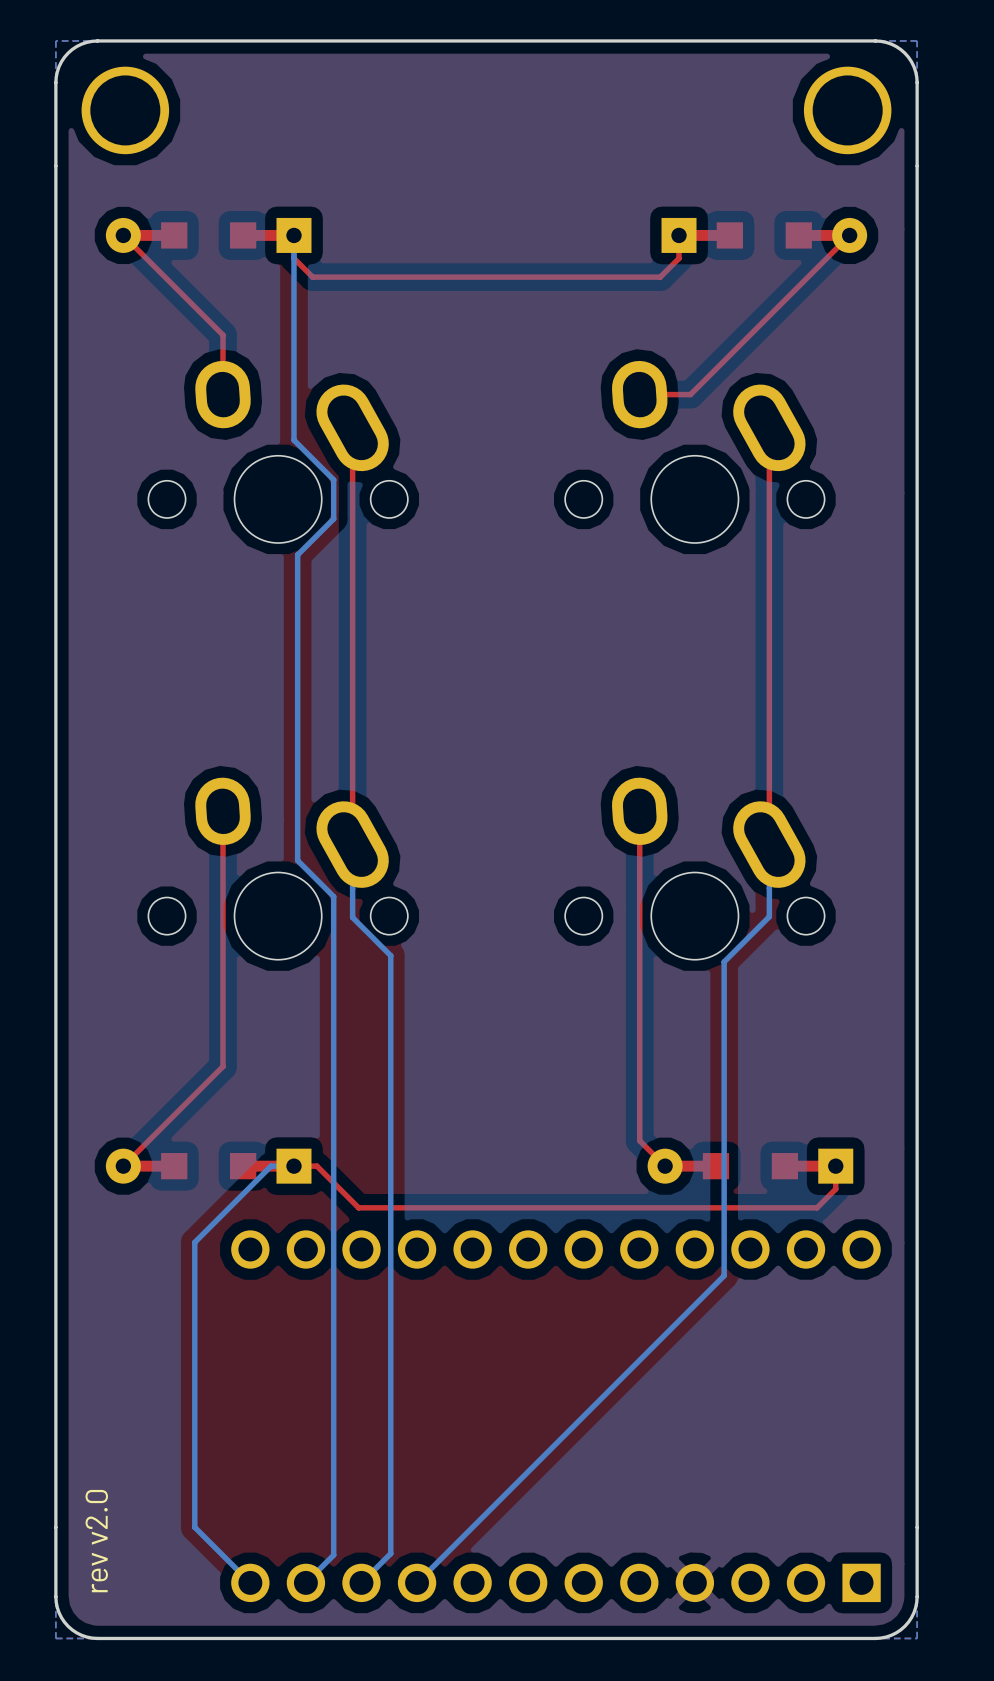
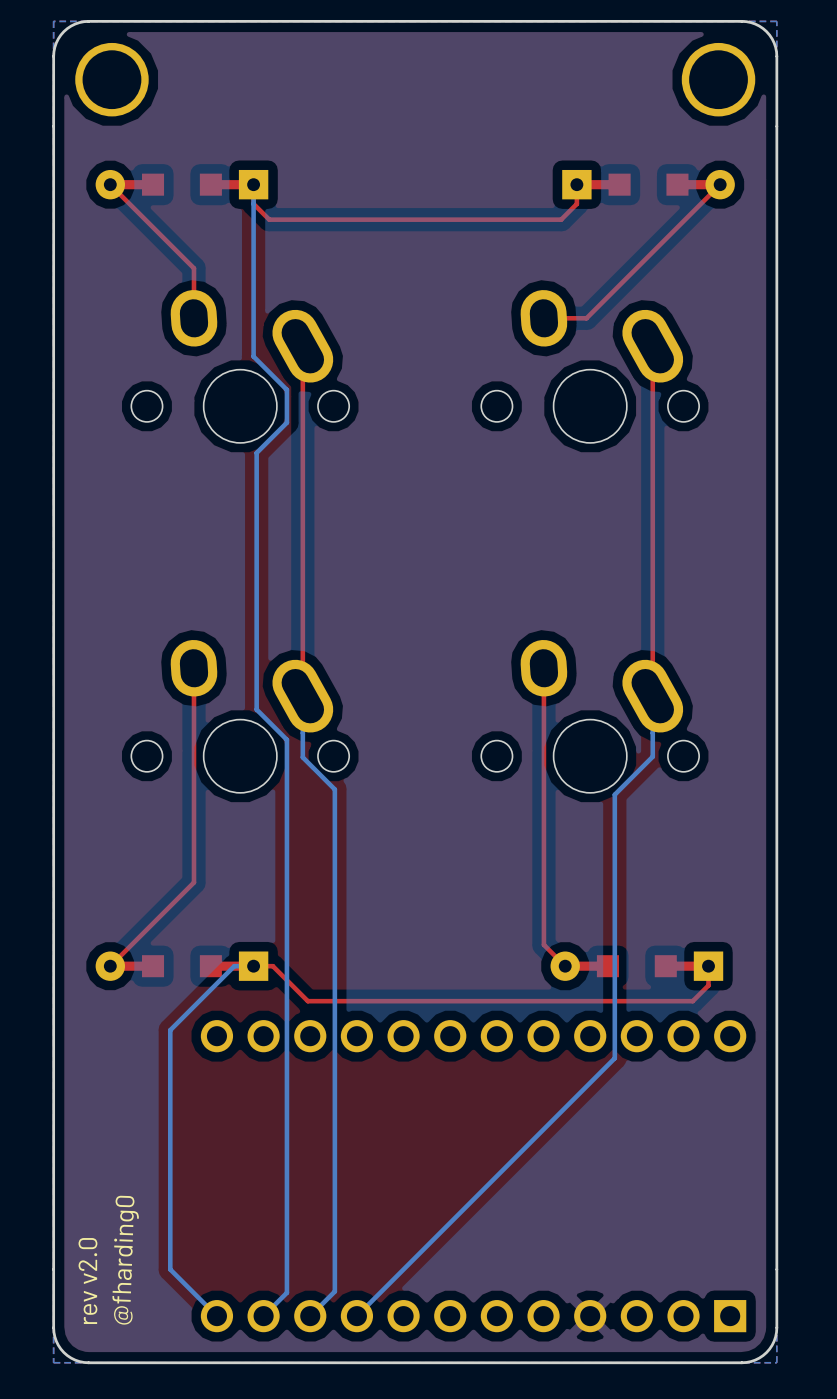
text: none -> @fharding0 (125, 1260)

